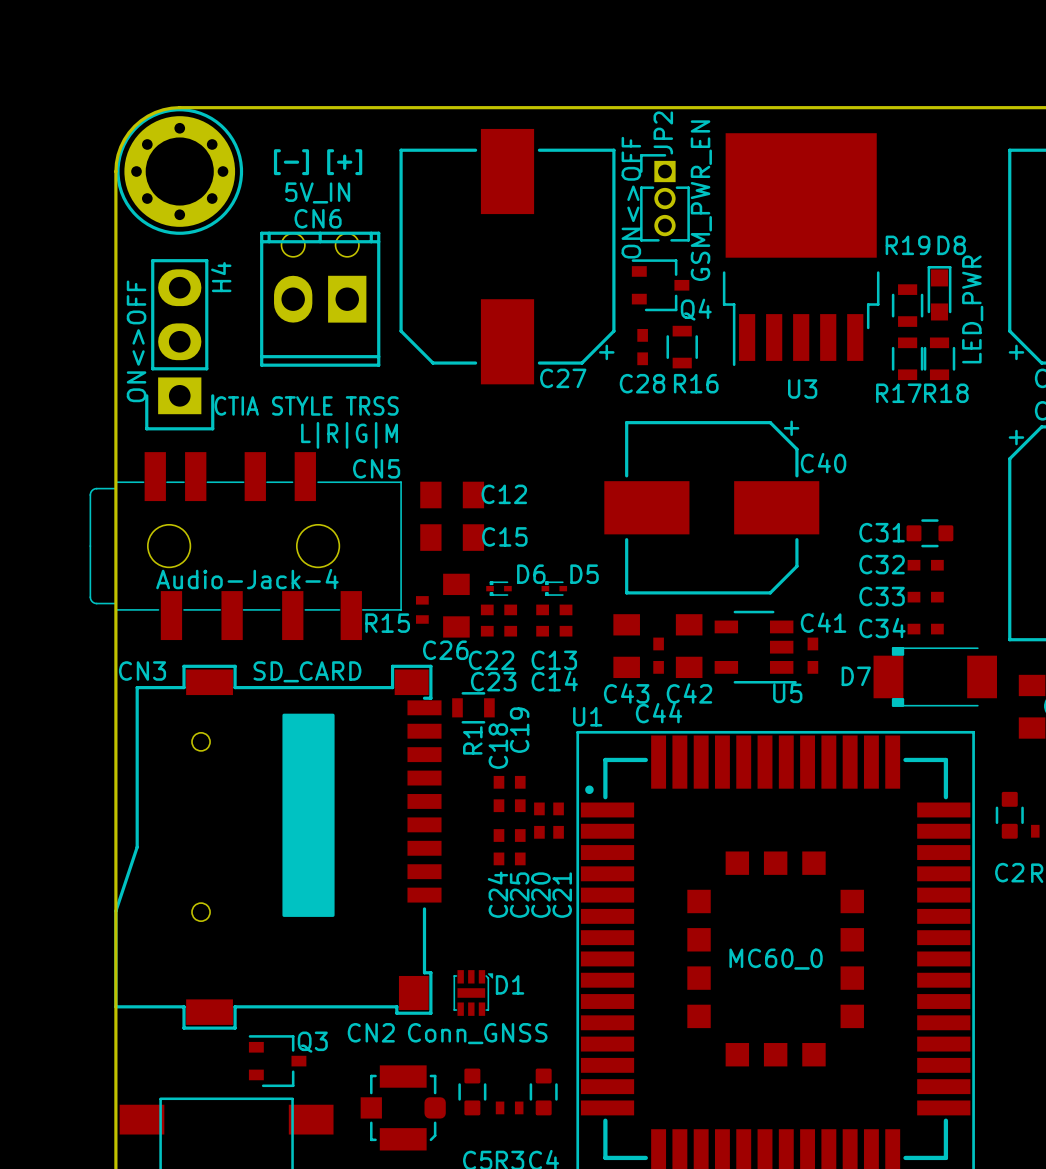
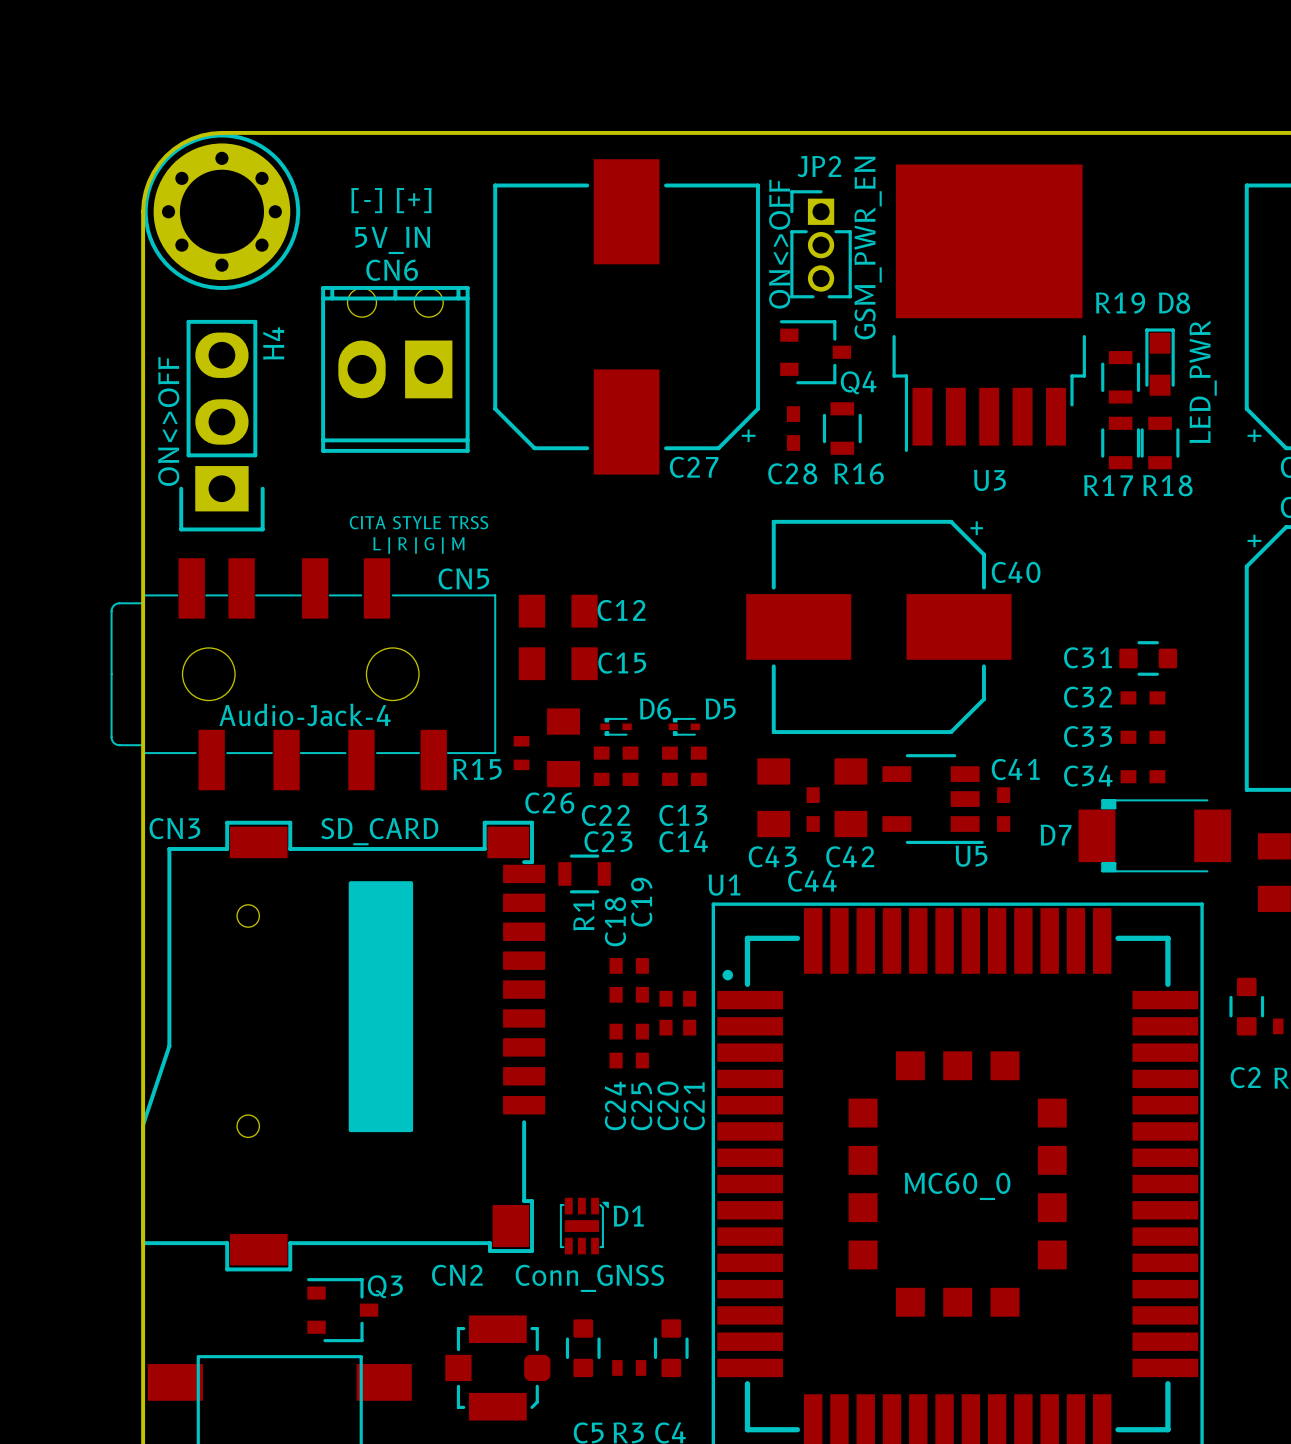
JP2 name rotation: 0° (663, 132) -> 90° clockwise (819, 166)
text: CTIA STYLE TRSS (306, 405) -> CITA STYLE TRSS (419, 522)
text: L|R|G|M (349, 435) -> L | R | G | M (418, 545)

